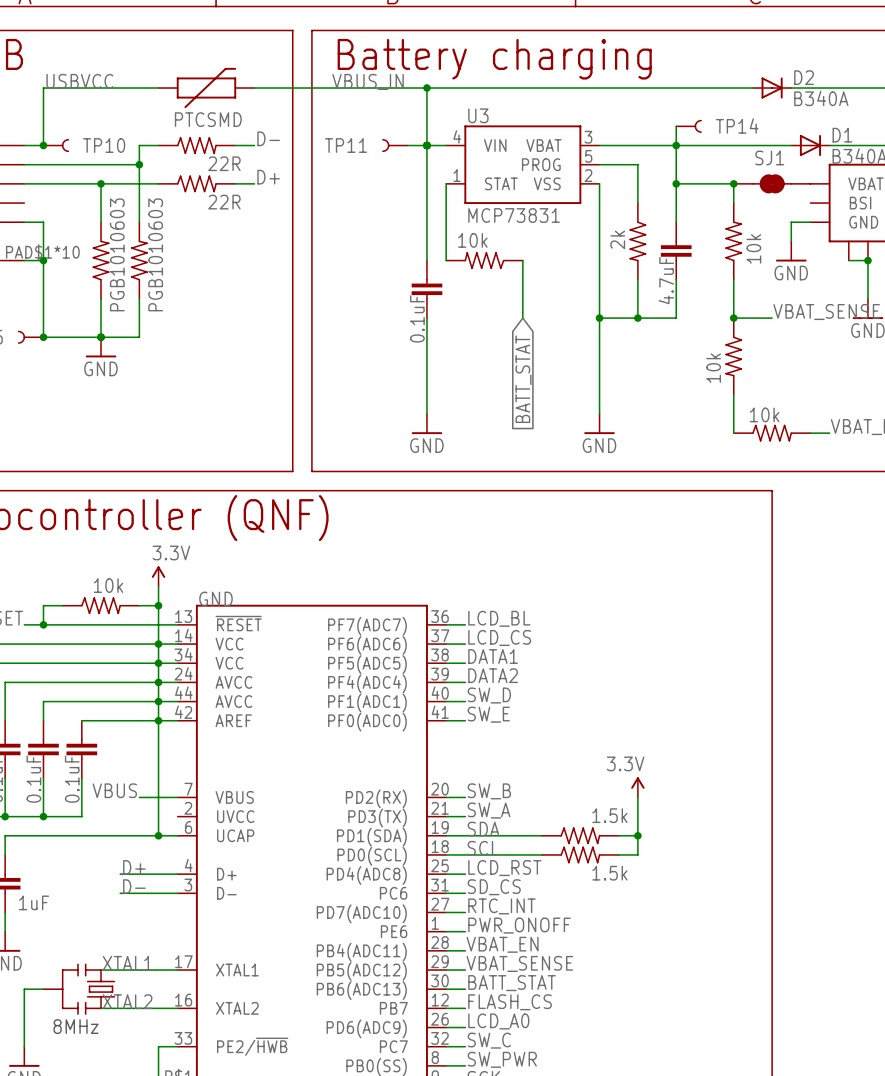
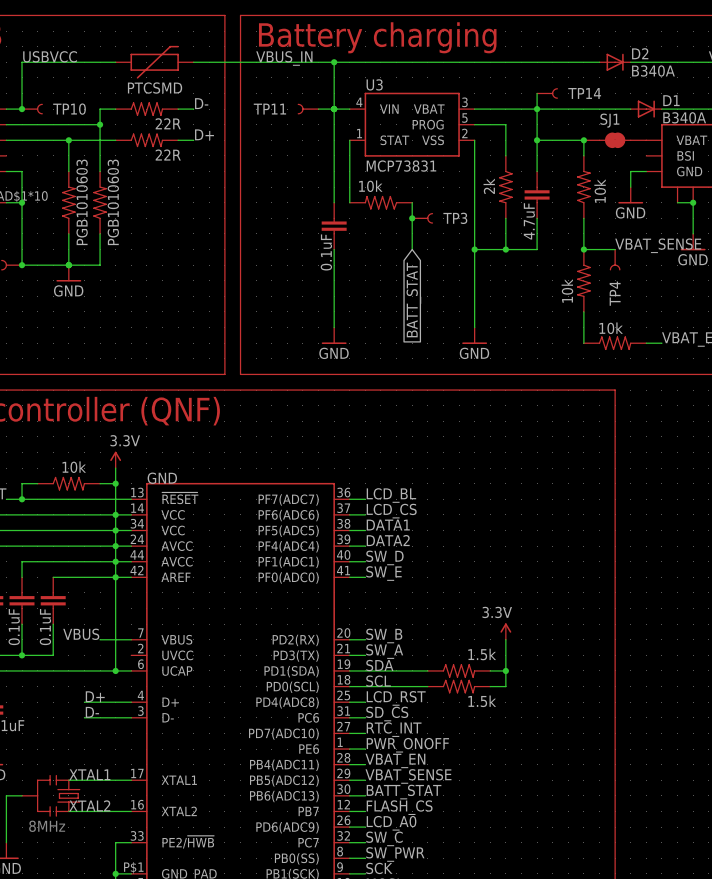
junction: none -> (412, 218)
TP3: none -> (422, 218)
TP4: none -> (615, 259)

